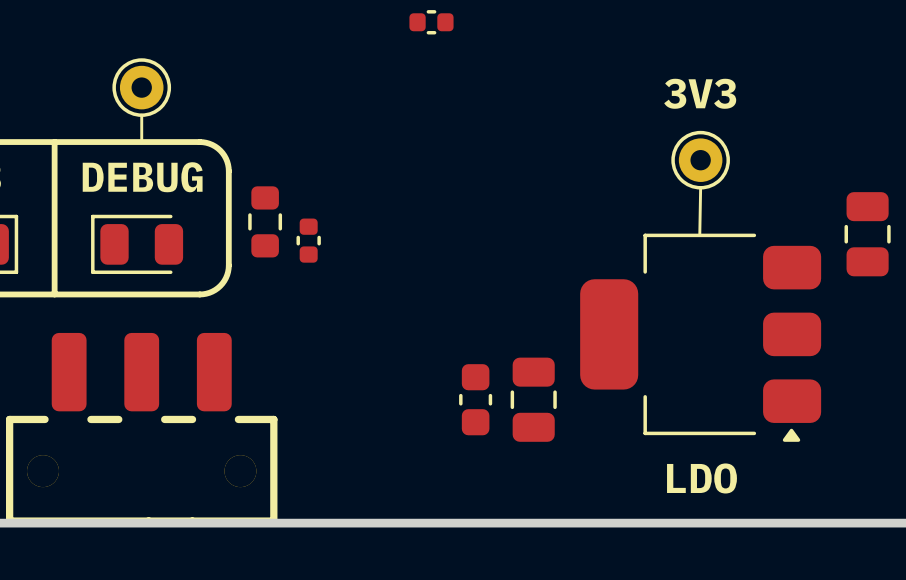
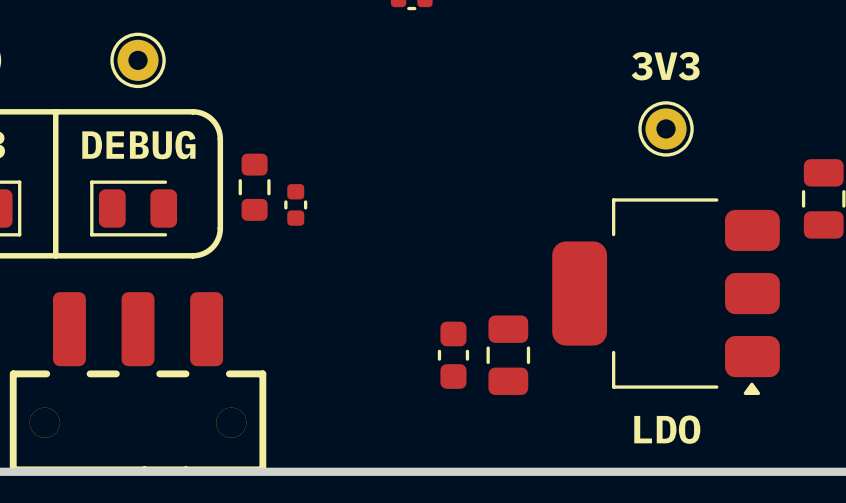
line: (141, 115) (141, 142) -> none
line: (700, 187) (699, 235) -> none

